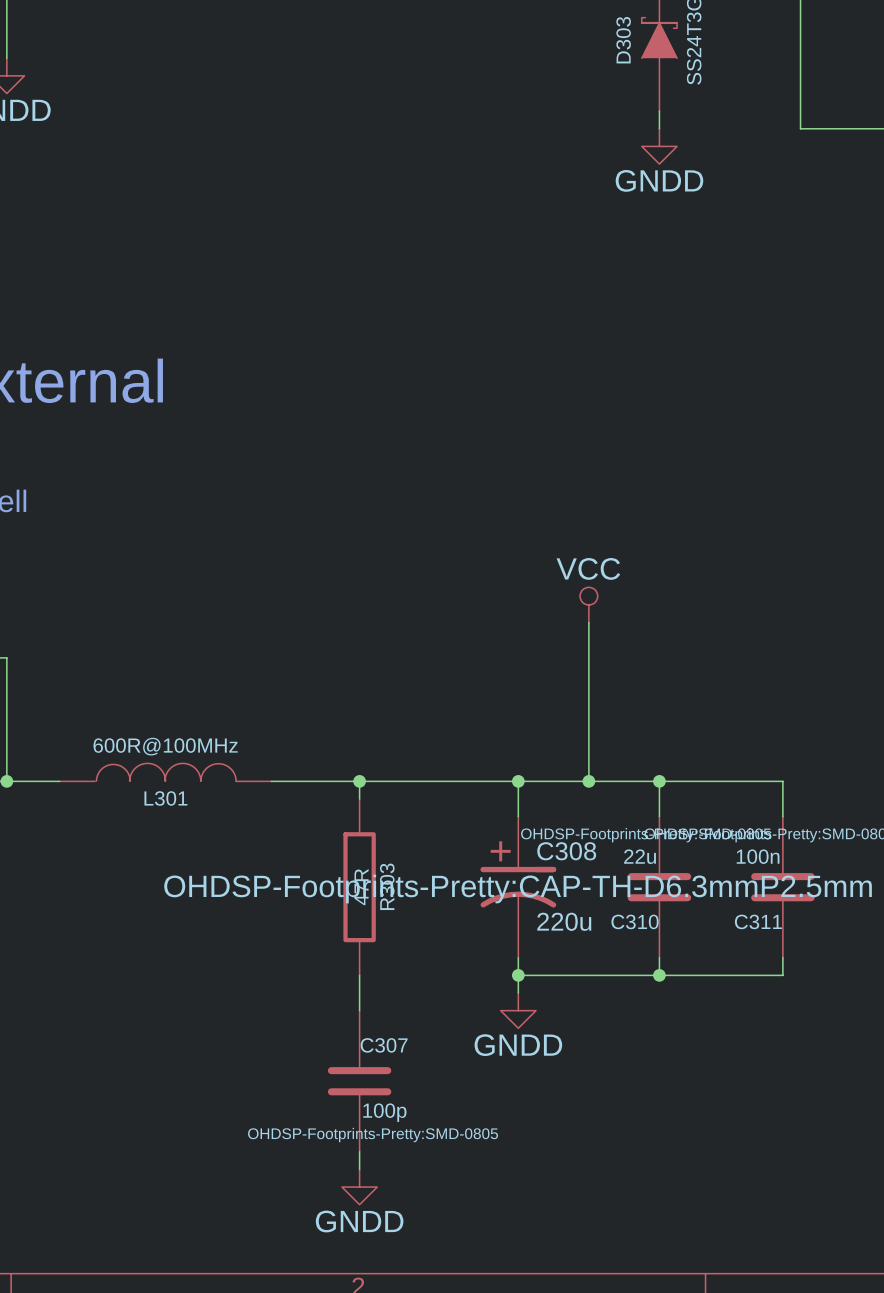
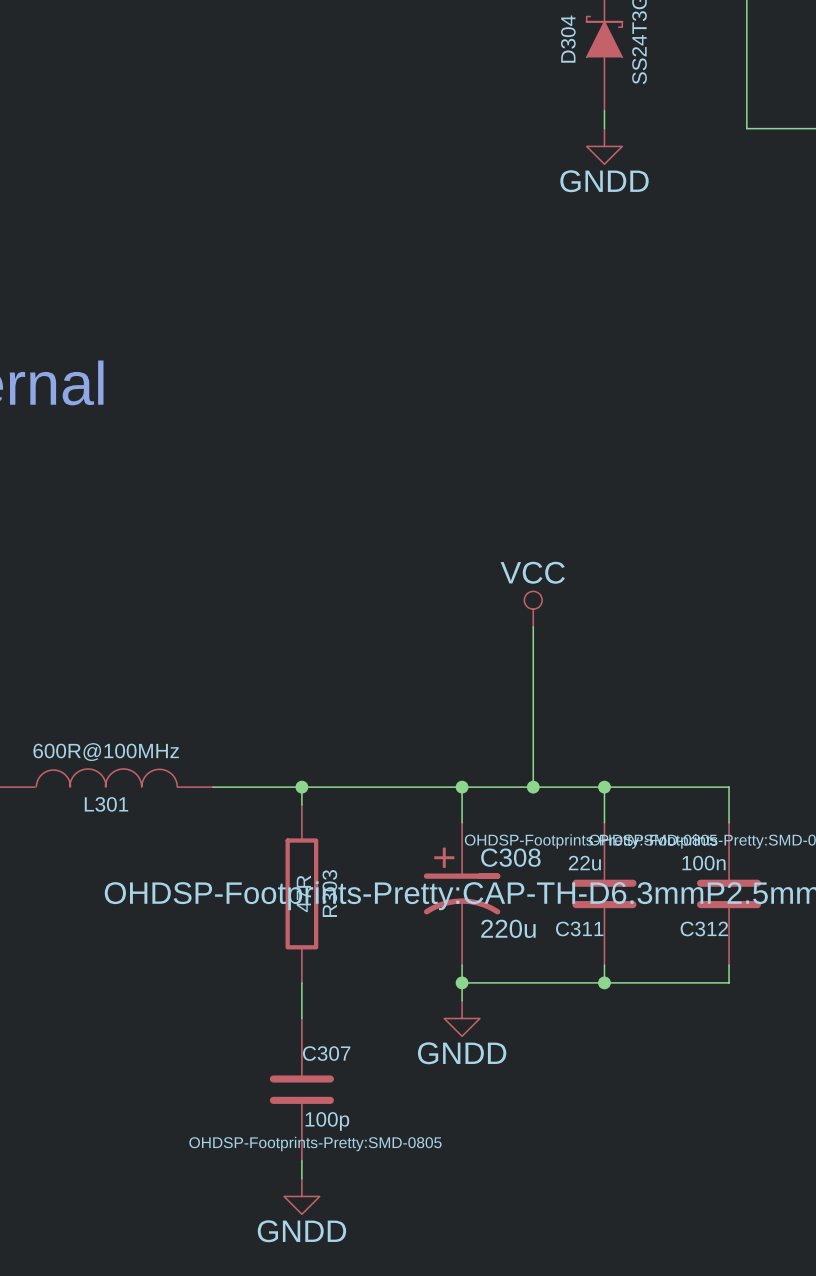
D303 name: D303 (623, 40) -> D304 (568, 39)
C310 name: C310 (635, 921) -> C311 (579, 928)
C311 name: C311 (758, 921) -> C312 (704, 928)

